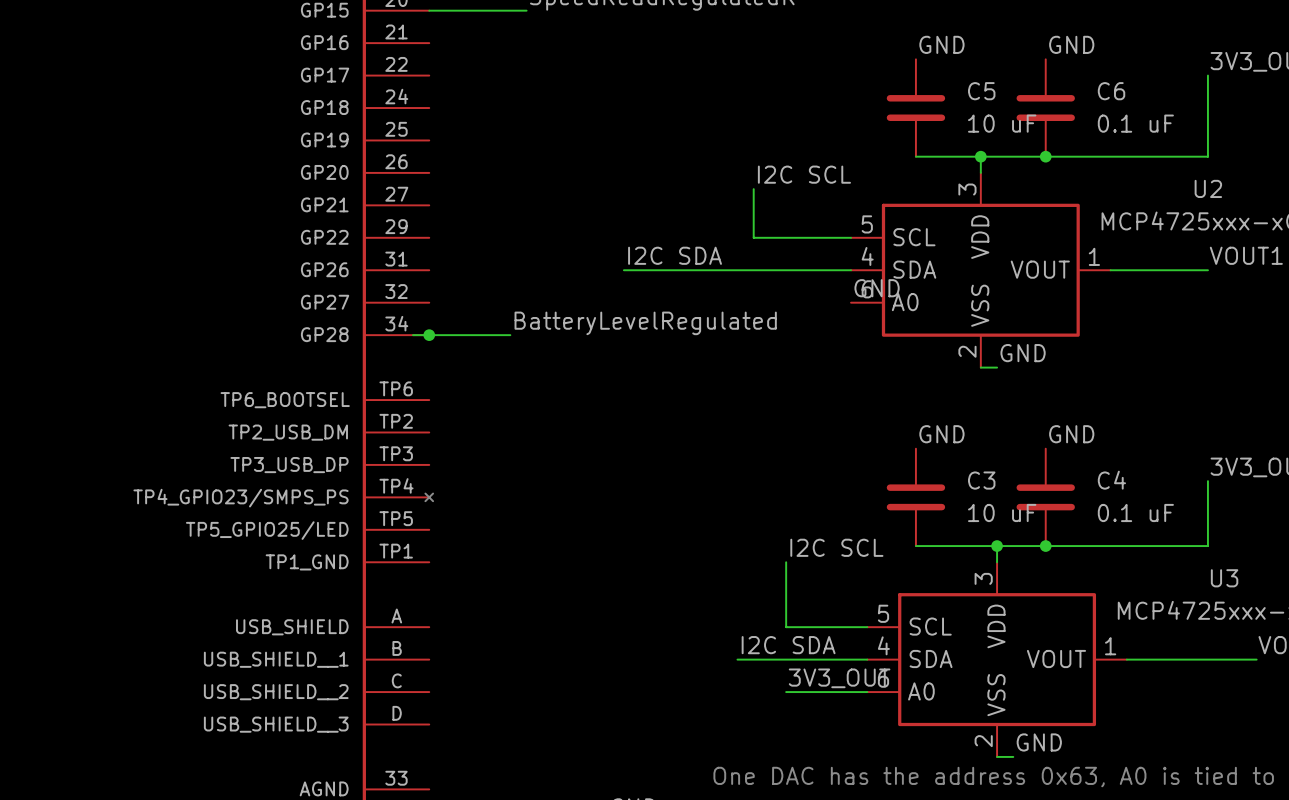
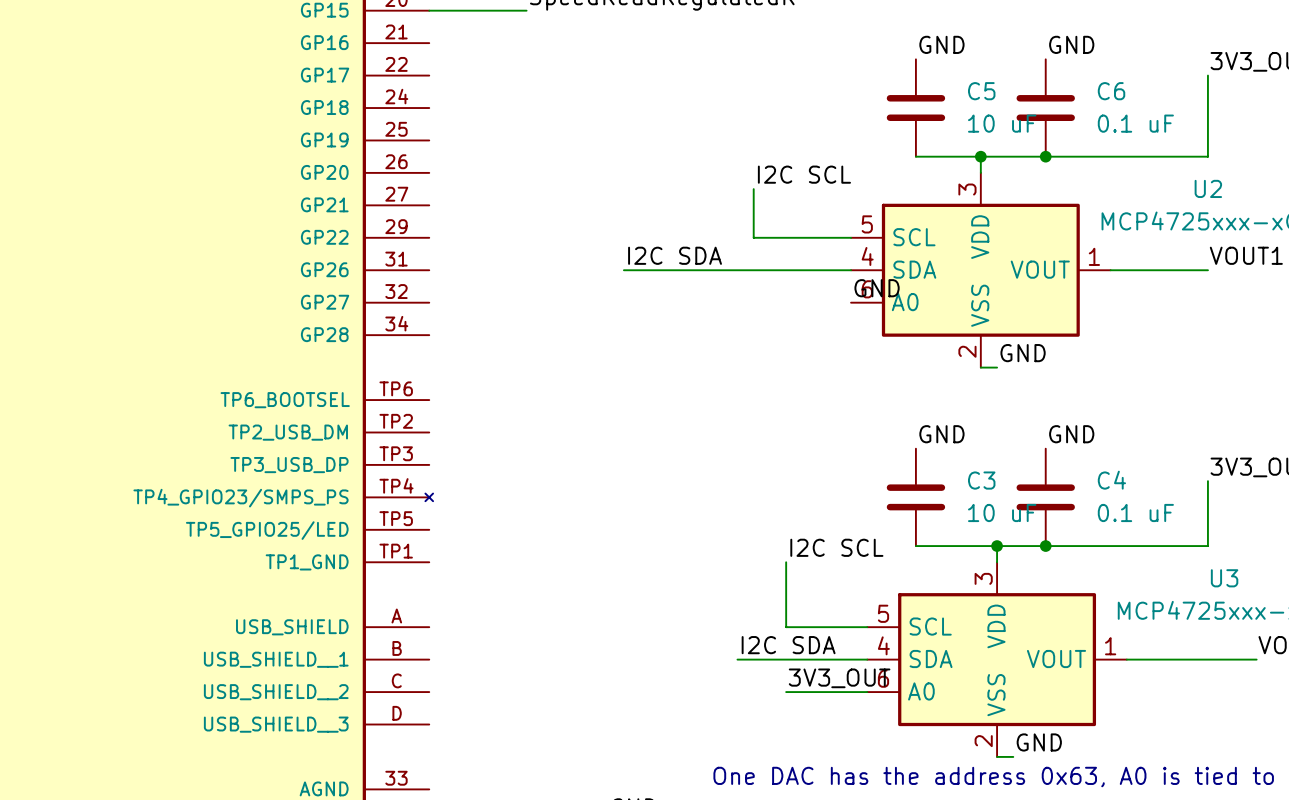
label: BatteryLevelRegulated (645, 323) -> none
wire: (413, 335) (510, 335) -> none
junction: (429, 335) -> none

